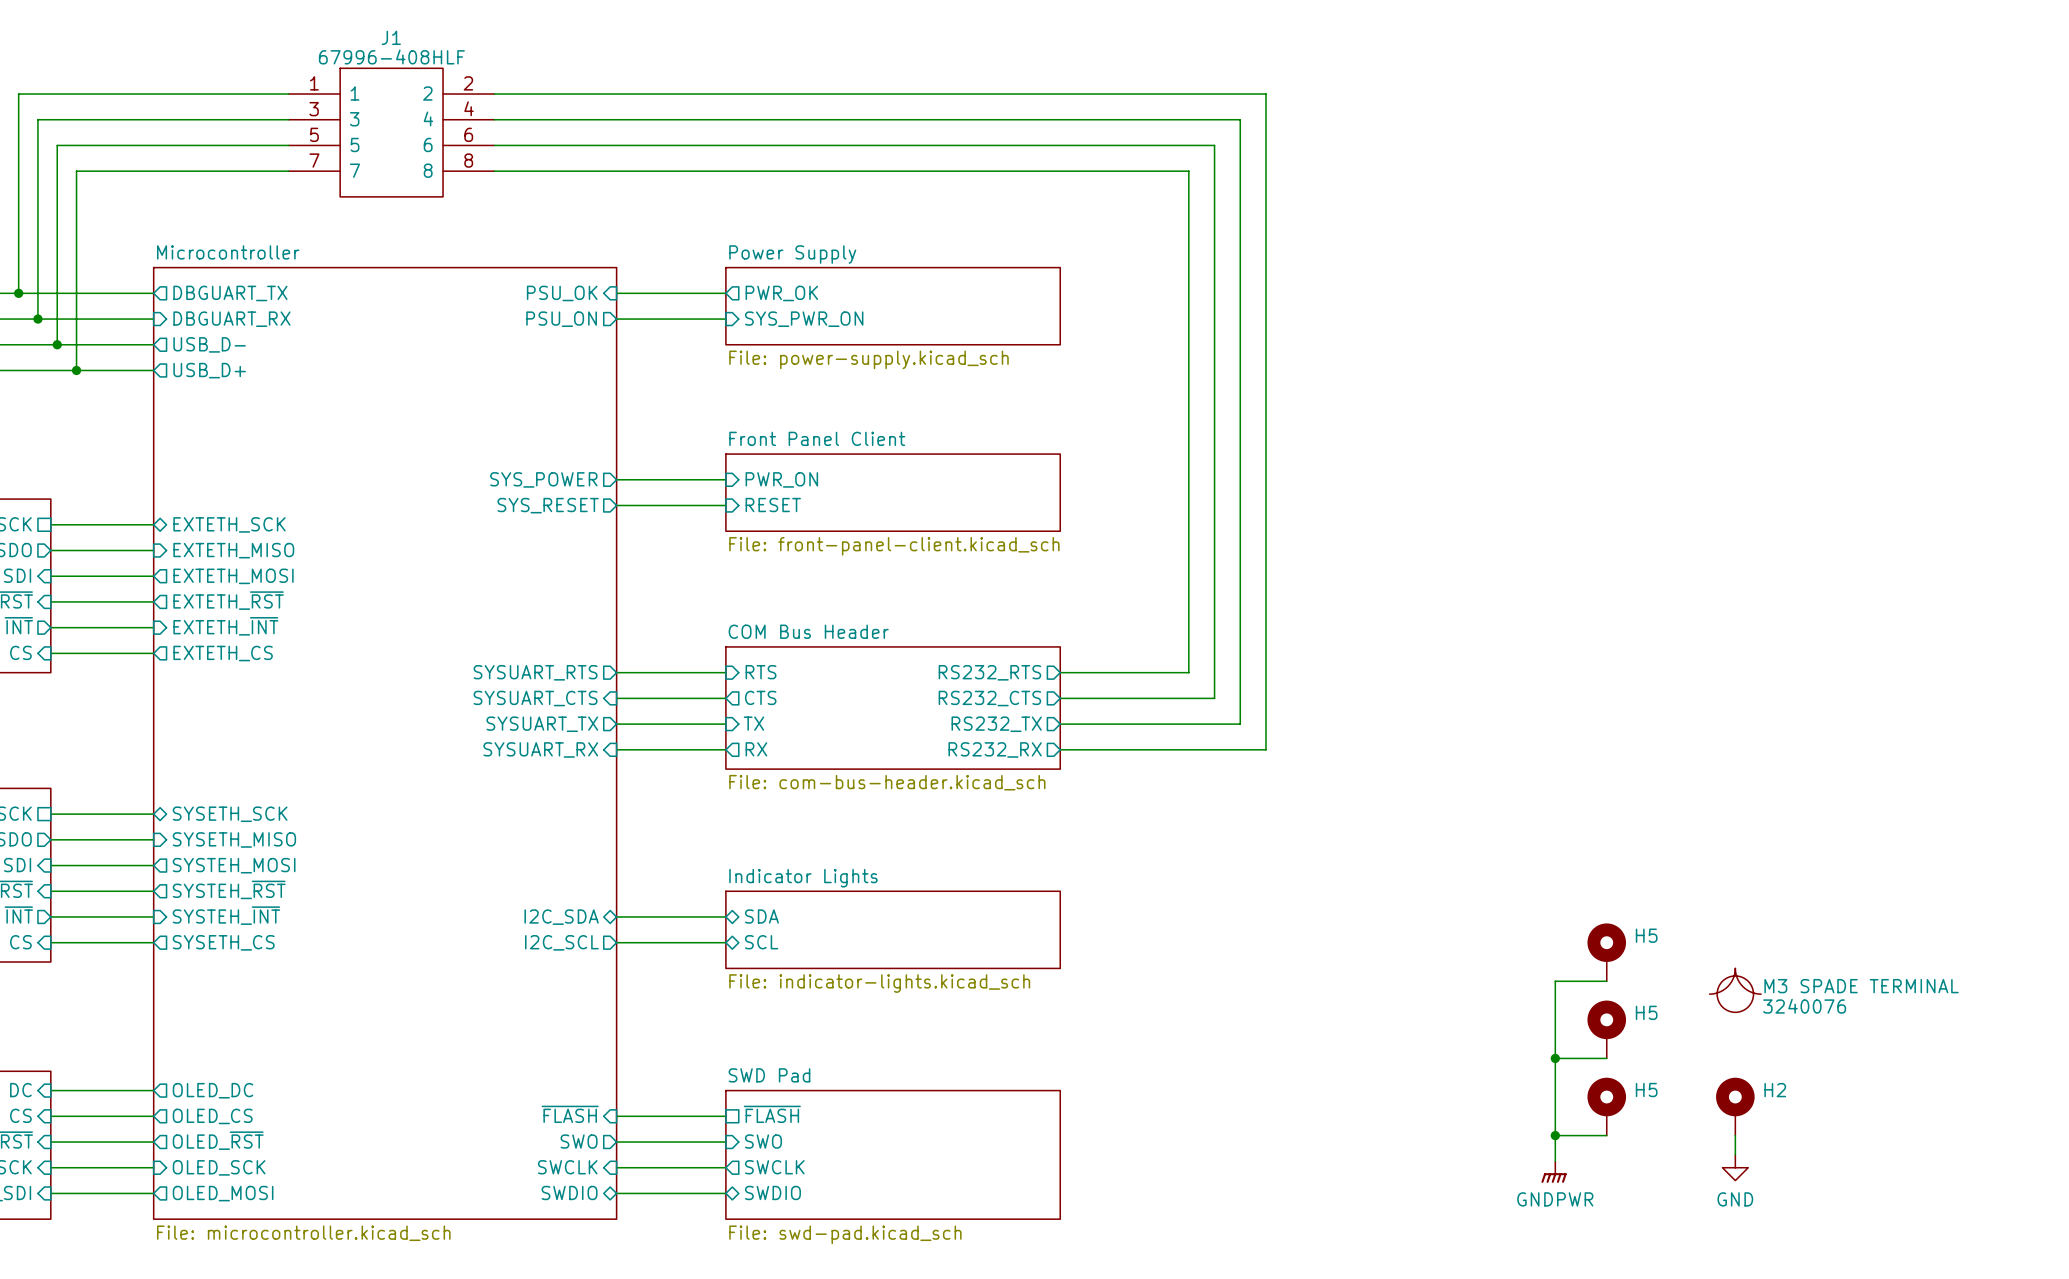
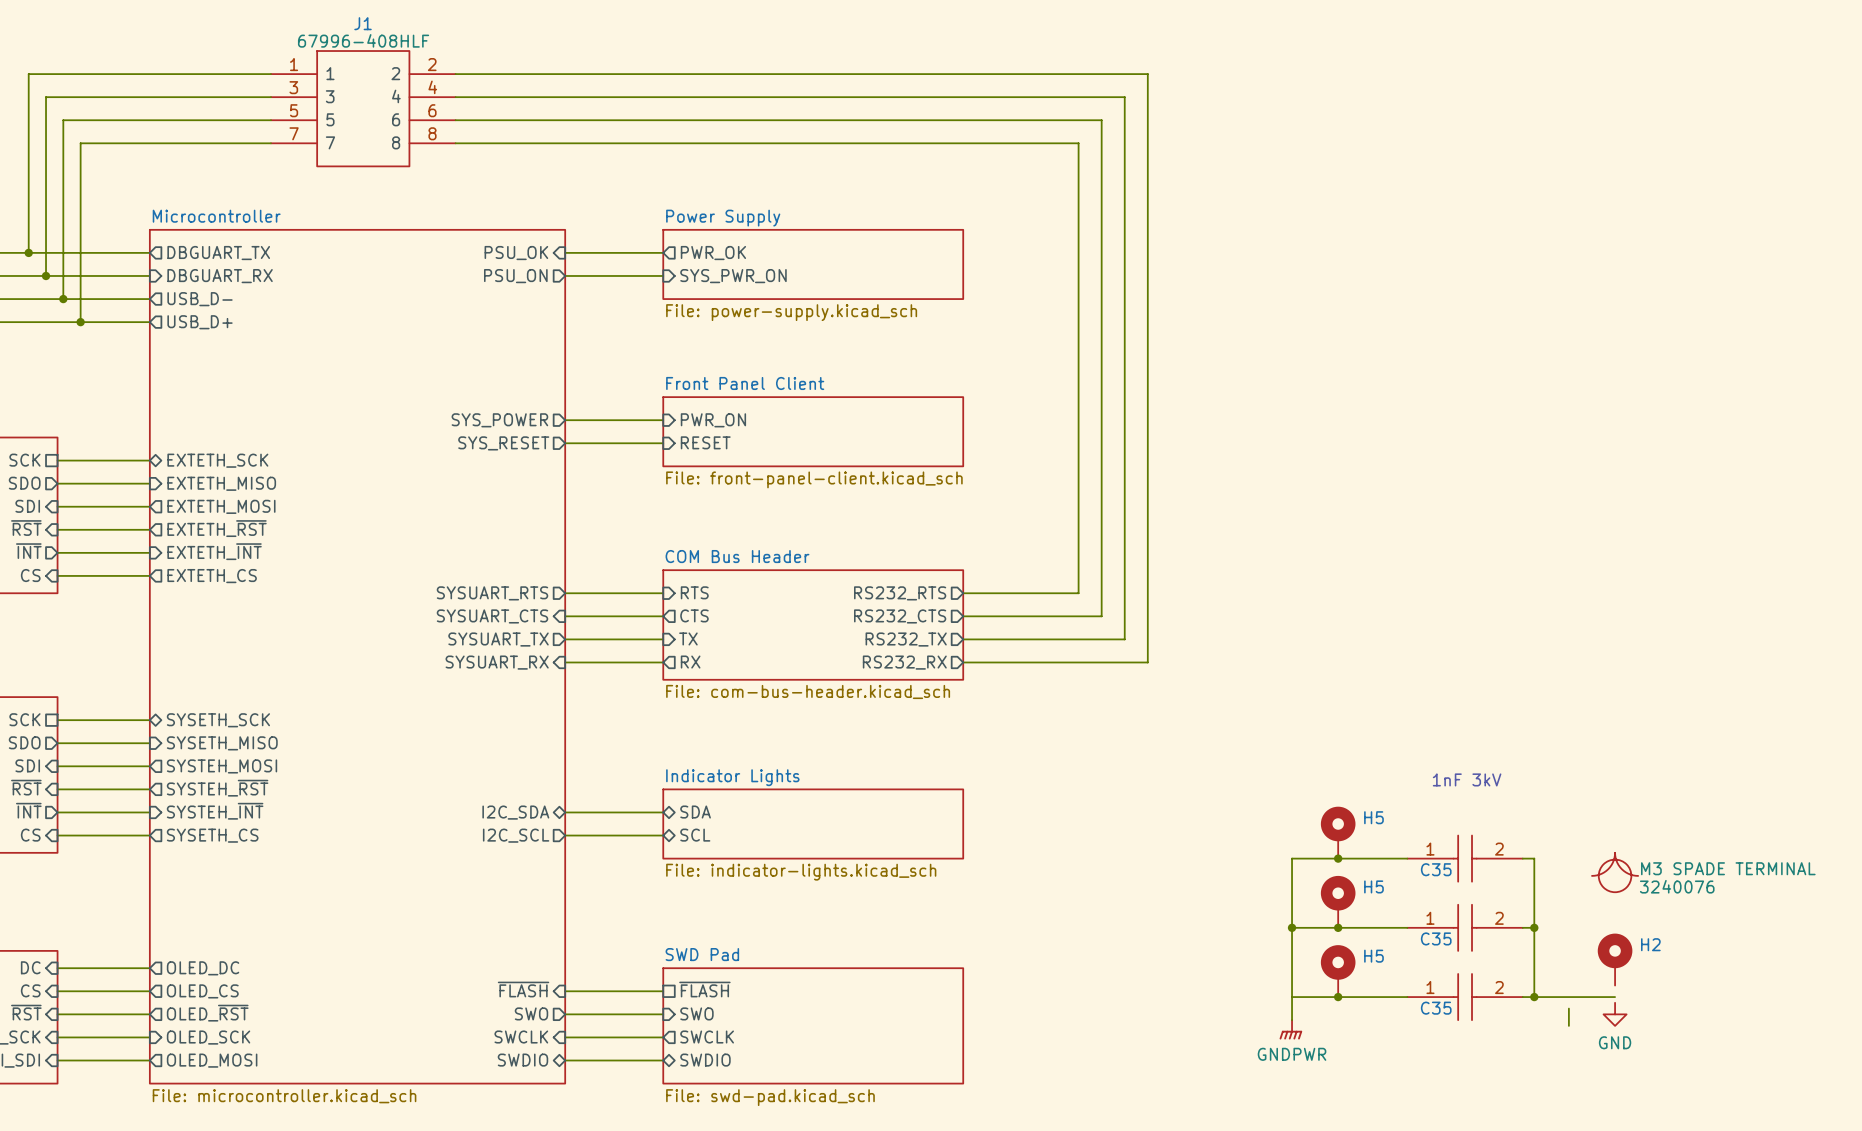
text: none -> 1nF 3kV (1467, 779)
H5: none -> (1338, 832)
H5: (1606, 952) -> none
junction: none -> (1338, 858)
wire: none -> (1407, 858) (1292, 858) (1292, 1020)
C35: none -> (1465, 858)
wire: none -> (1522, 858) (1534, 858) (1534, 997)
wire: (1606, 981) (1555, 981) (1555, 1161) -> none
part position: (1735, 990) -> (1615, 872)
H5: none -> (1338, 901)
H5: (1606, 1029) -> none
wire: none -> (1292, 927) (1407, 927)
junction: none -> (1292, 927)
junction: none -> (1338, 927)
C35: none -> (1465, 927)
wire: none -> (1522, 927) (1534, 927)
junction: none -> (1534, 927)
wire: (1555, 1058) (1606, 1058) -> none
junction: (1555, 1058) -> none
H5: none -> (1338, 971)
H5: (1606, 1106) -> none
H2 position: (1735, 1106) -> (1615, 959)
wire: none -> (1292, 997) (1407, 997)
junction: none -> (1338, 997)
C35: none -> (1465, 997)
wire: none -> (1522, 997) (1615, 997)
junction: none -> (1534, 997)
wire: (1555, 1135) (1606, 1135) -> none
junction: (1555, 1135) -> none
power symbol position: GND (1735, 1167) -> GND (1615, 1014)
power symbol position: GNDPWR (1554, 1172) -> GNDPWR (1290, 1029)

